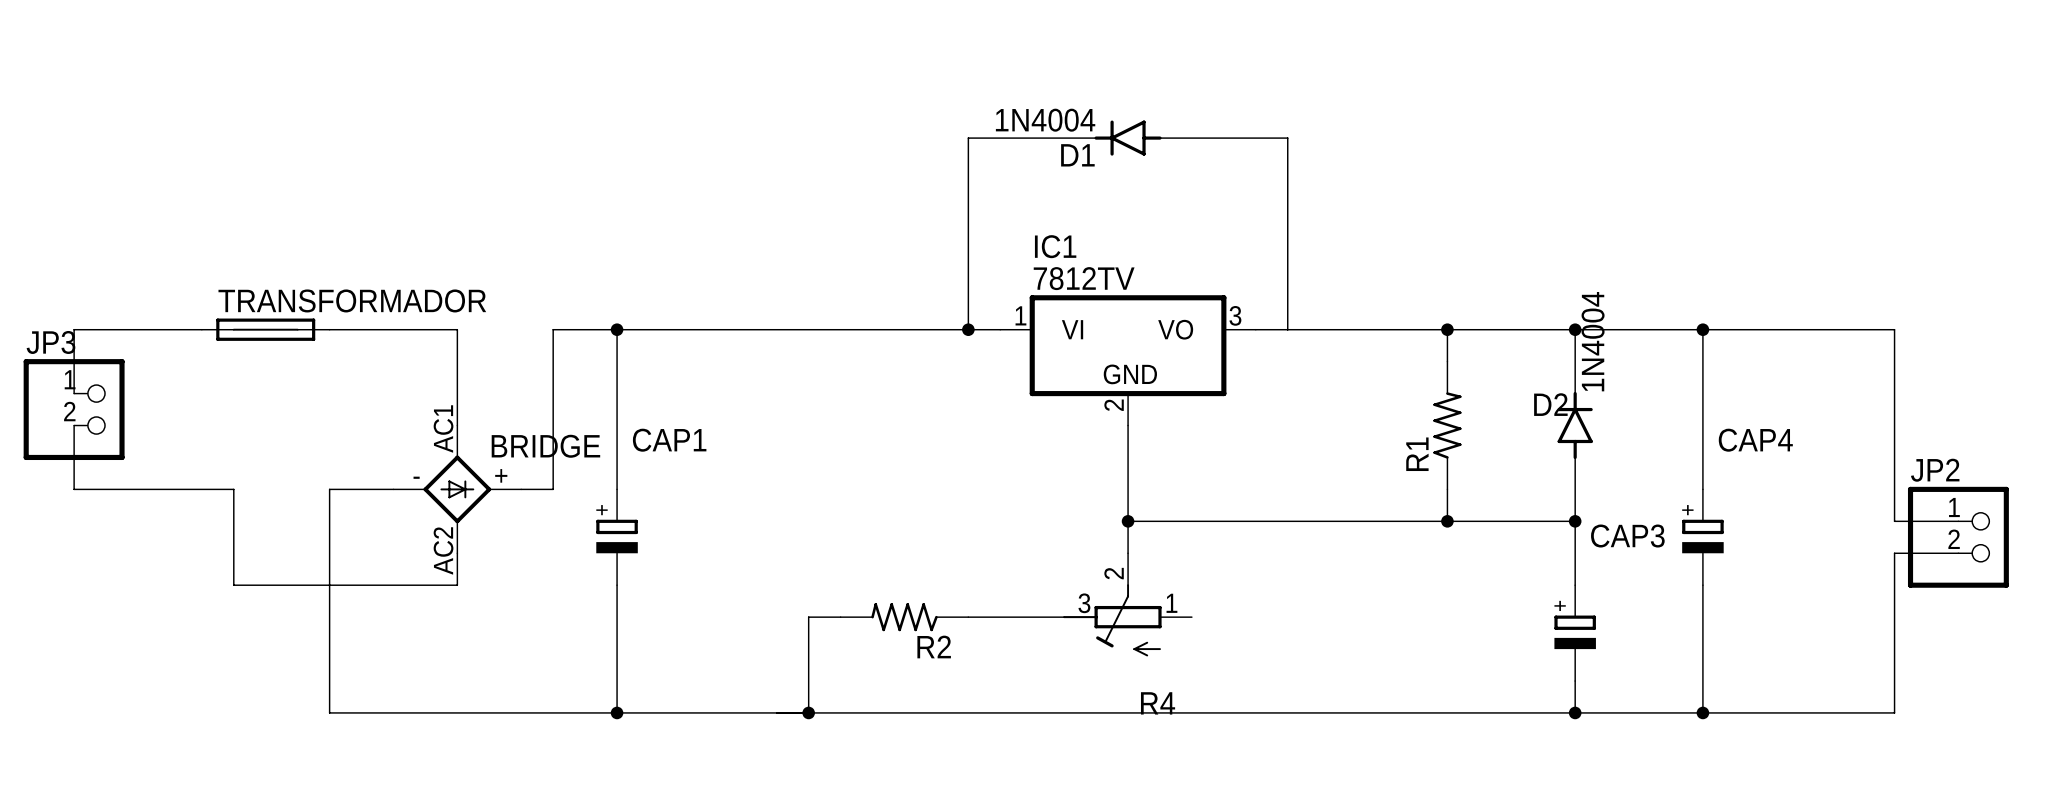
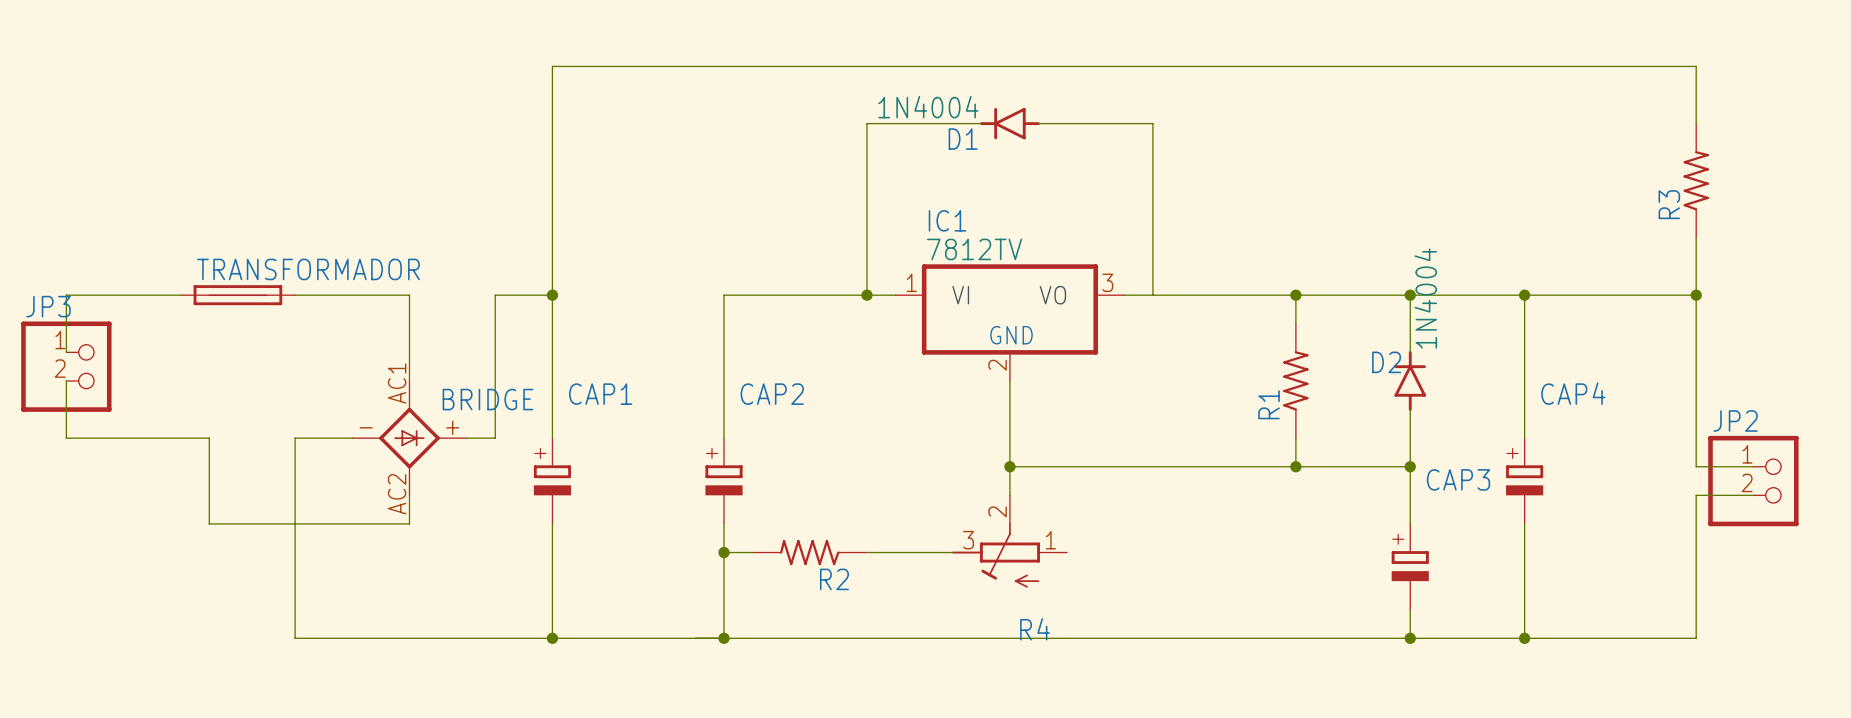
wire: none -> (1696, 123) (1696, 66) (552, 66) (552, 295)
R3: none -> (1696, 180)
wire: none -> (1696, 238) (1696, 295)
wire: (617, 329) (808, 329) -> (724, 438) (724, 295)
junction: none -> (1696, 295)
CAP2: none -> (724, 481)
wire: none -> (724, 523) (724, 552)
junction: none -> (724, 552)

